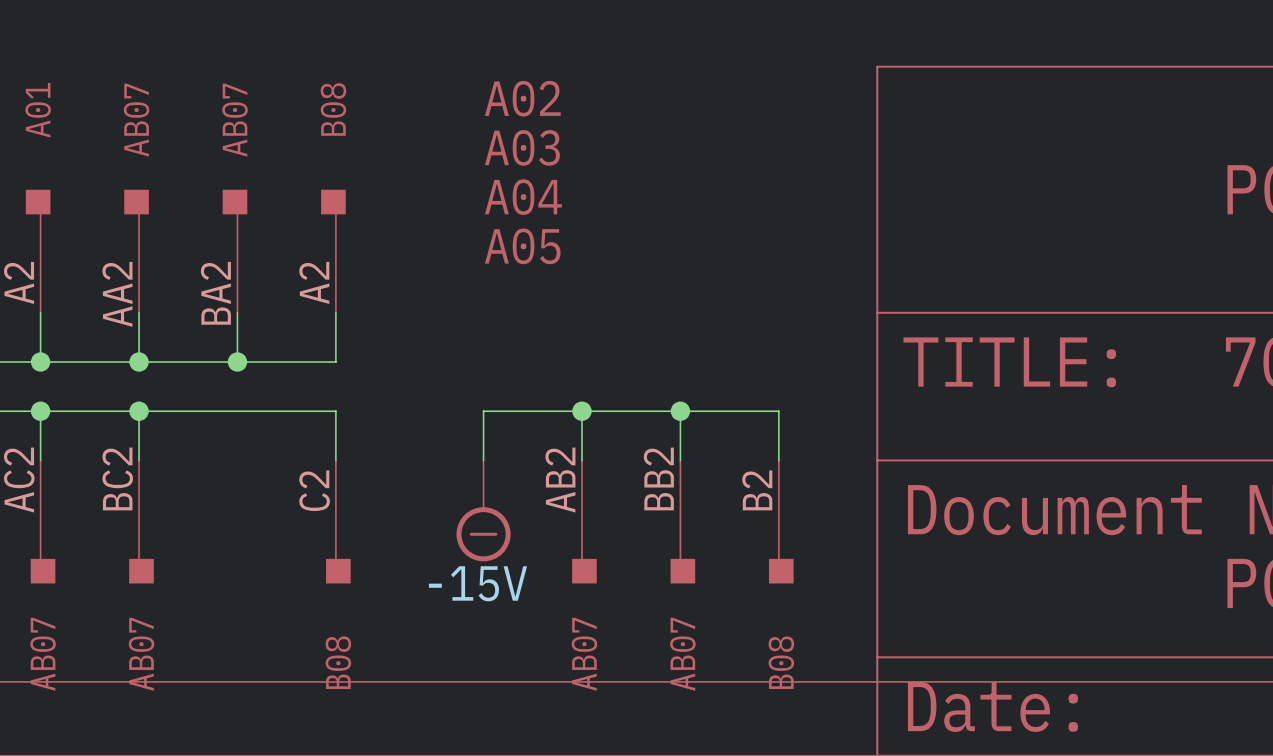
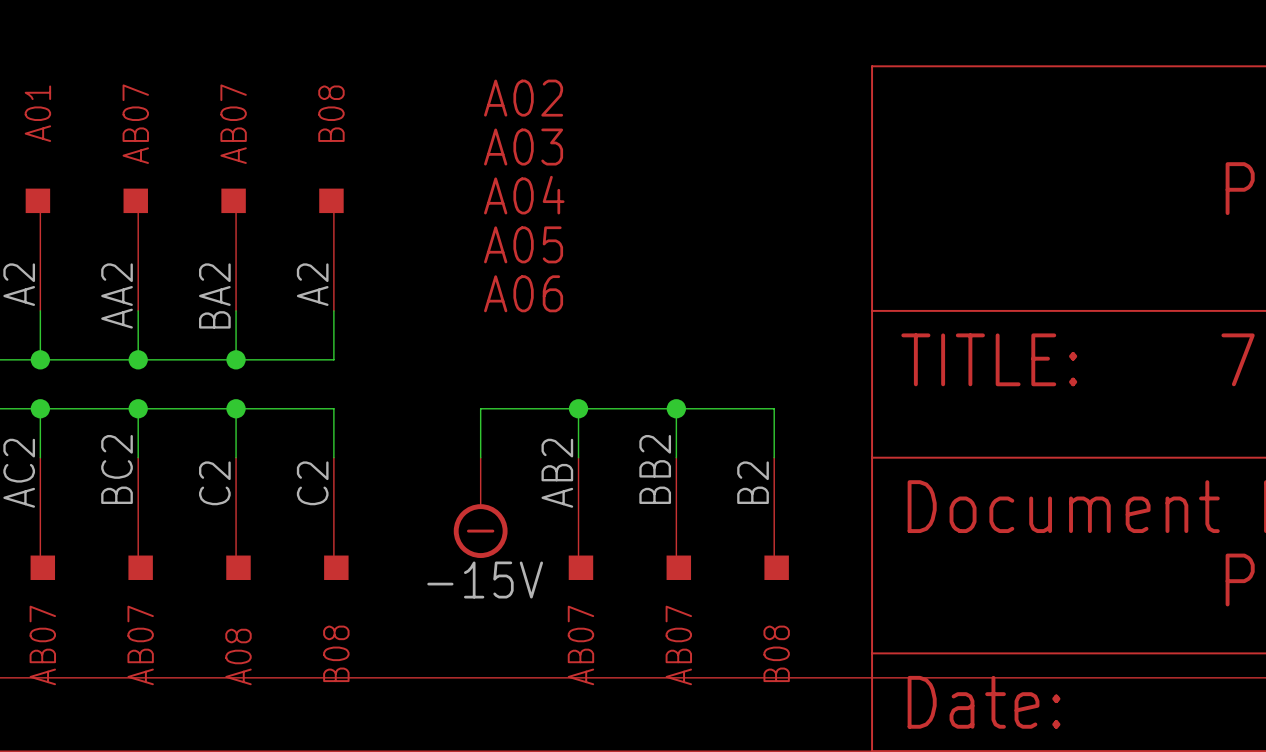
A06: none -> (523, 293)
wire: none -> (236, 408) (236, 457)
junction: none -> (236, 408)
A08: none -> (238, 518)

